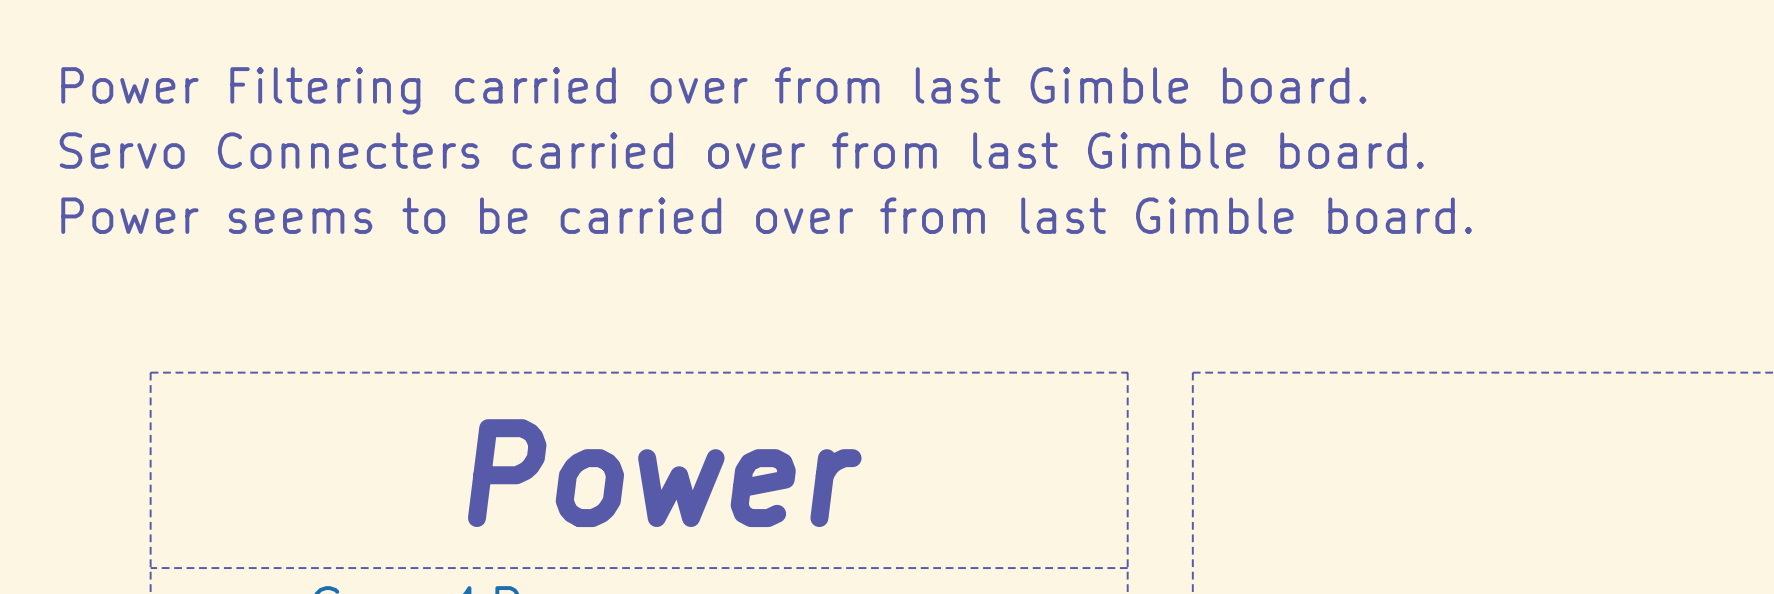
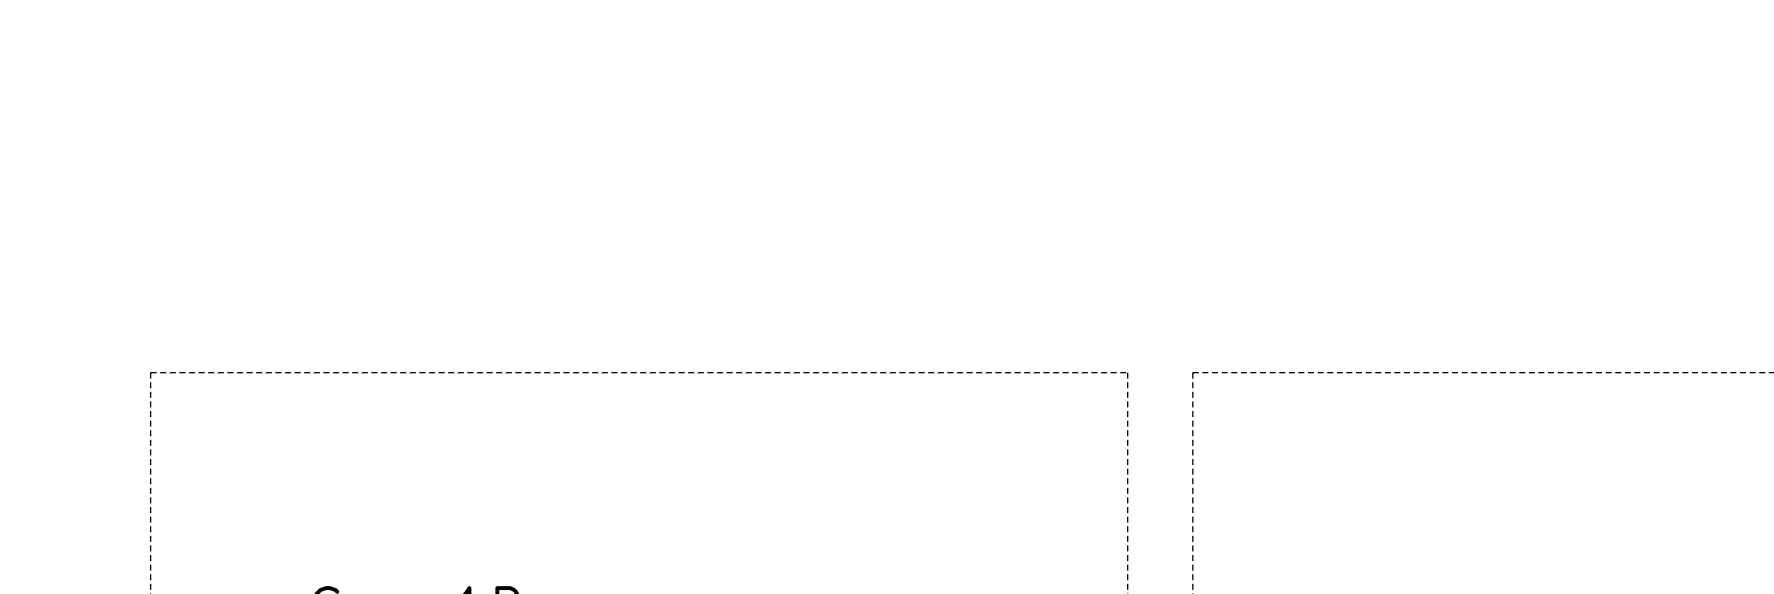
text: Power Filtering carried over from last Gimble board. (713, 90) -> none
text: Servo Connecters carried over from last Gimble board. (741, 150) -> none
text: Power seems to be carried over from last Gimble board. (766, 215) -> none
text: Power (664, 473) -> none
line: (150, 568) (1127, 568) -> none

